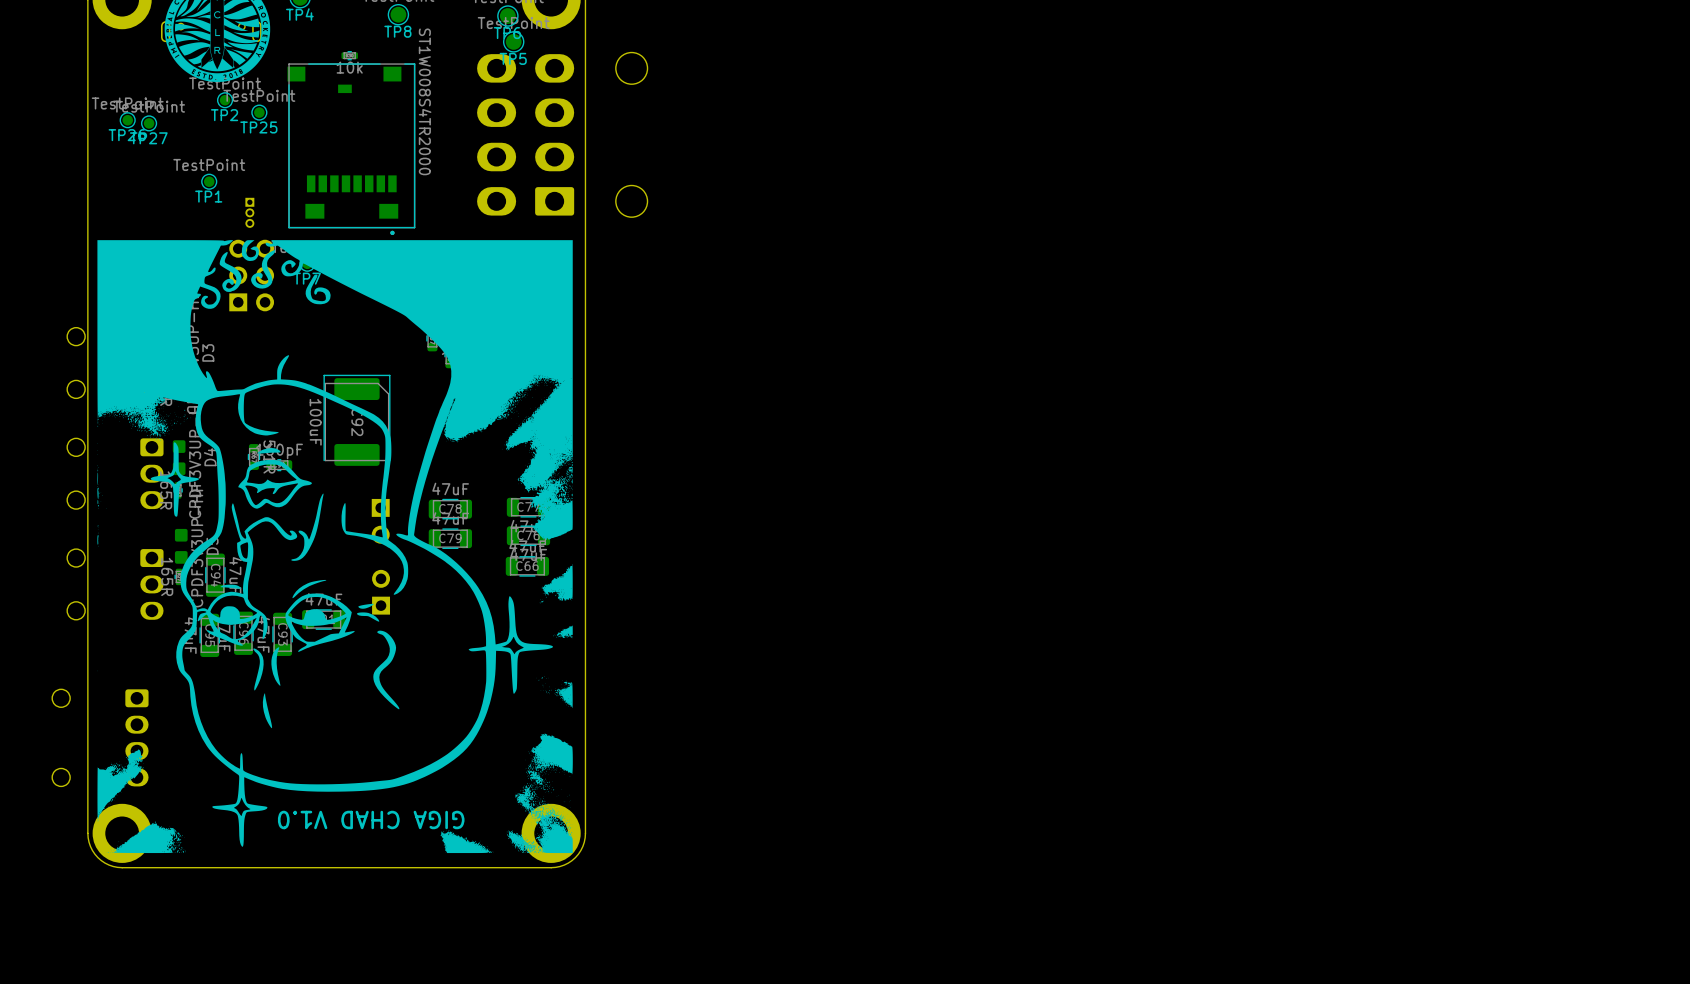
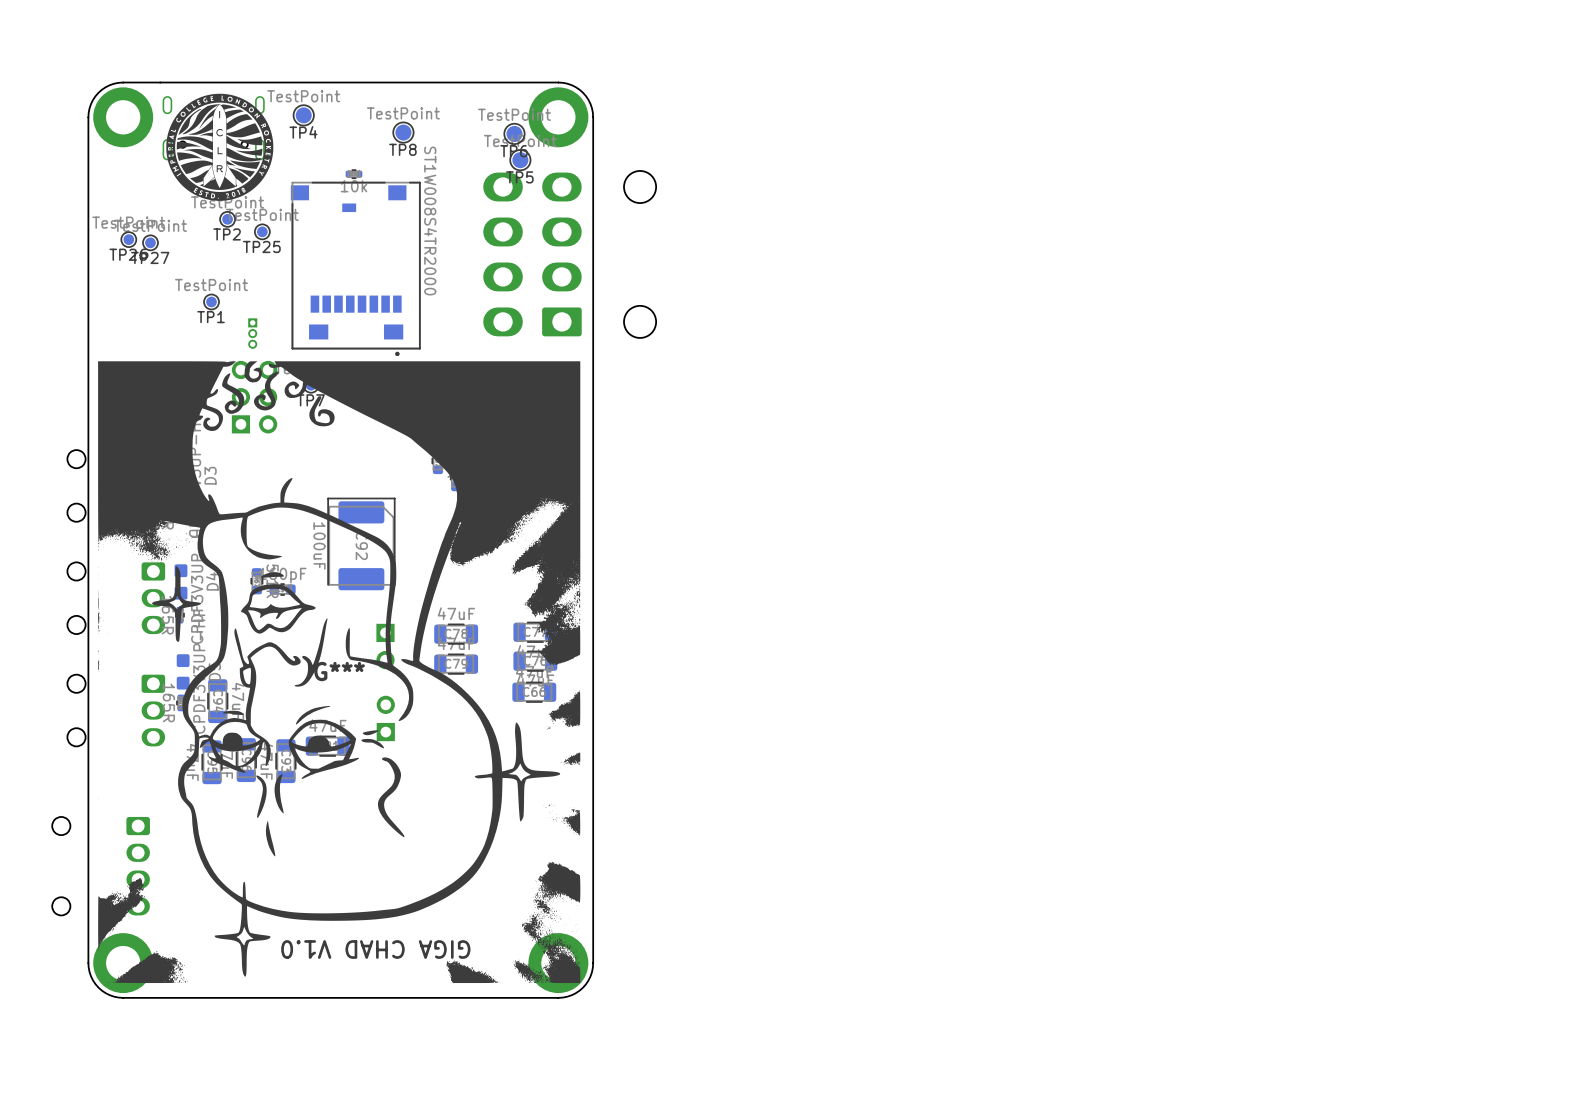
drawing: [97, 240, 573, 854] -> none
G***: none -> (339, 672)

